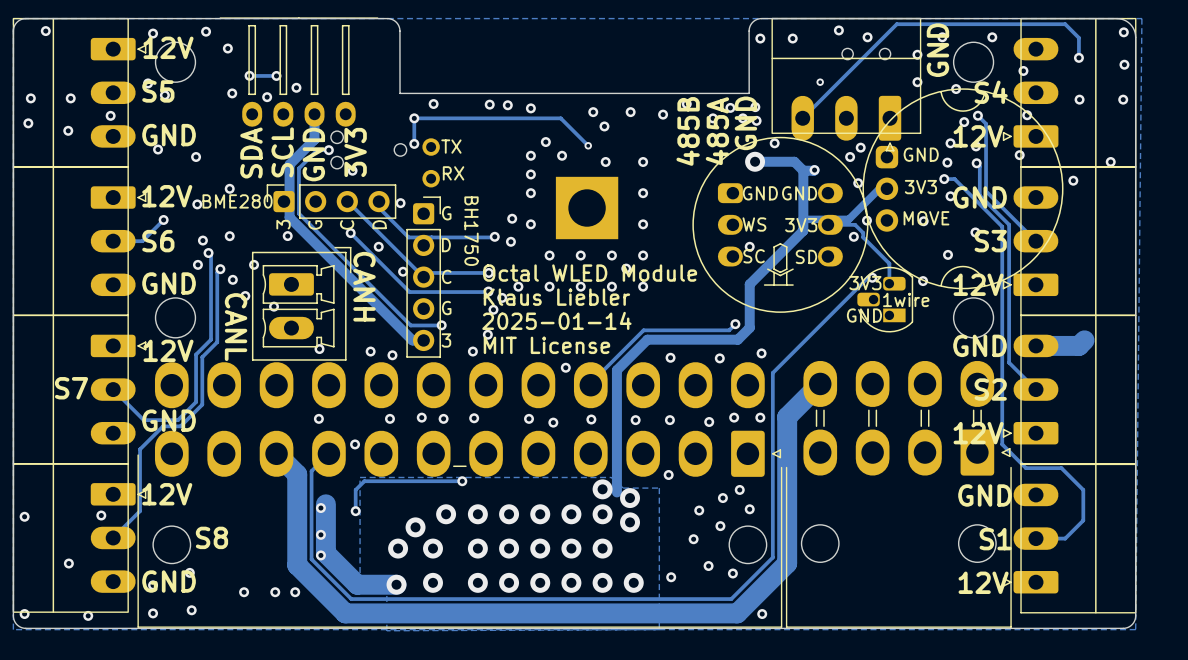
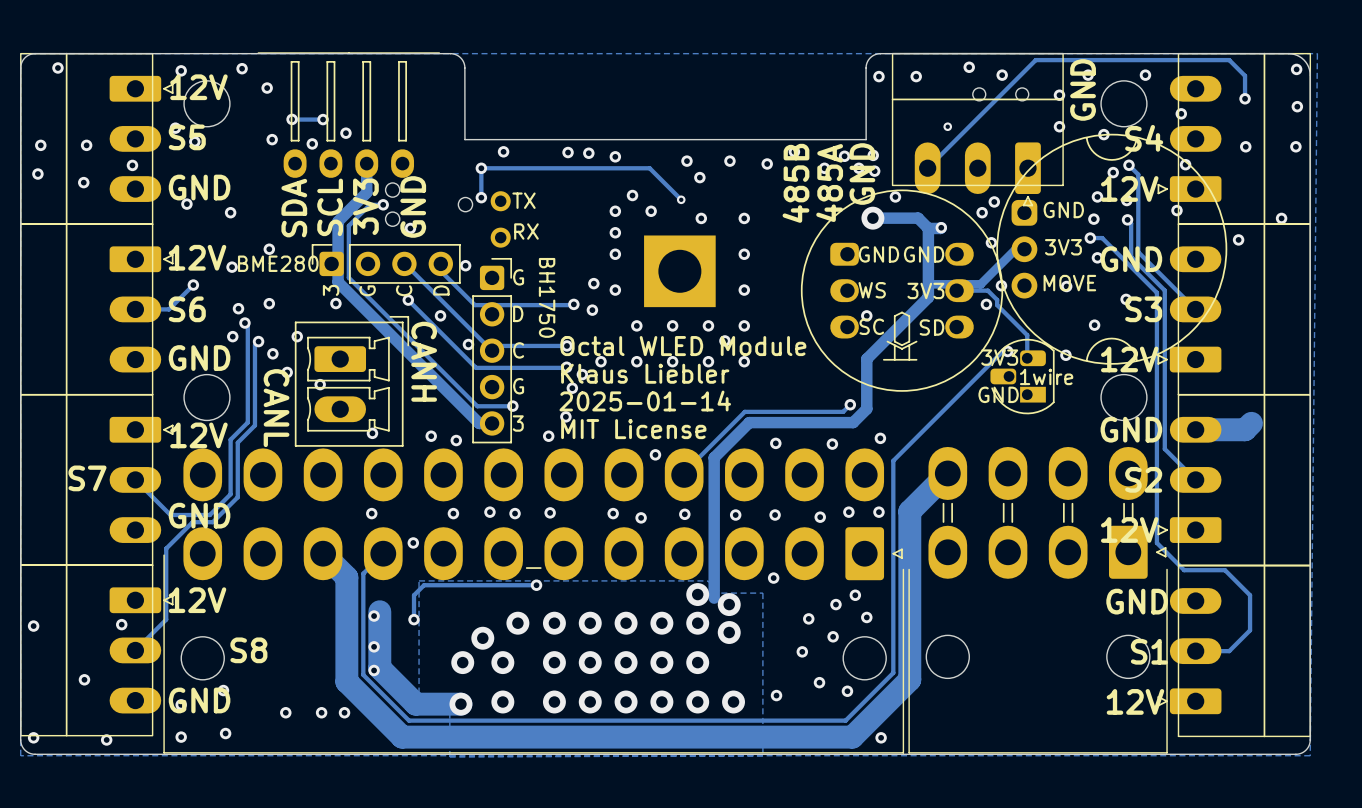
text: 3V3 (355, 152) -> GND (413, 206)
text: GND (313, 154) -> 3V3 (365, 206)

